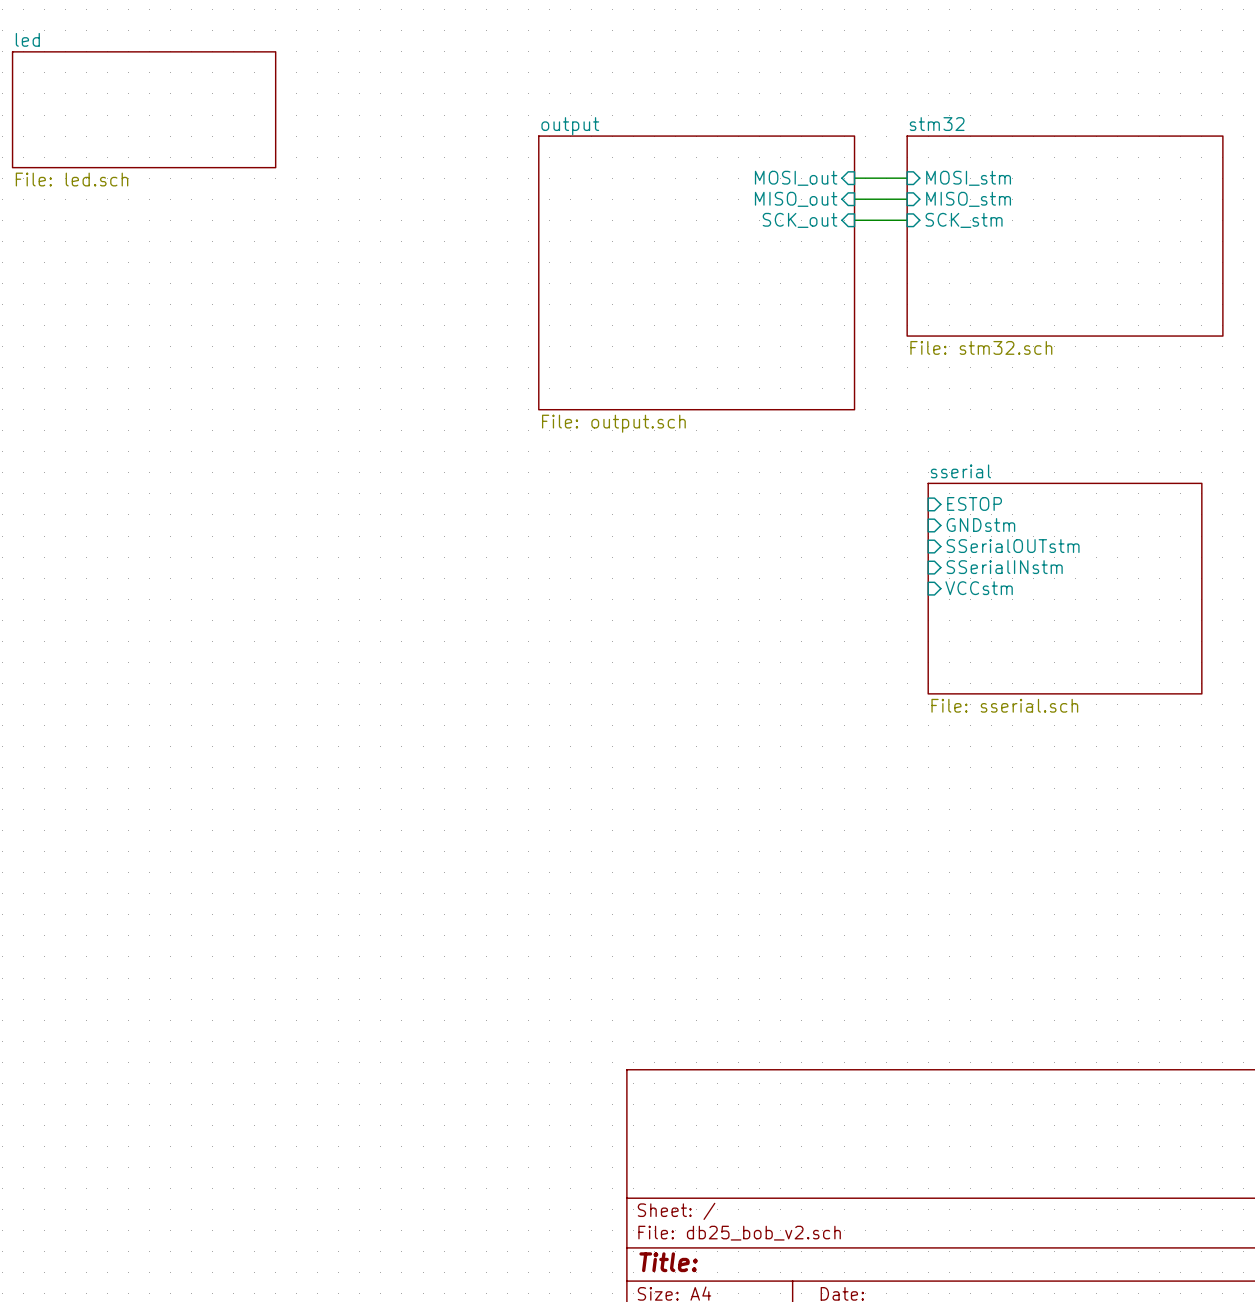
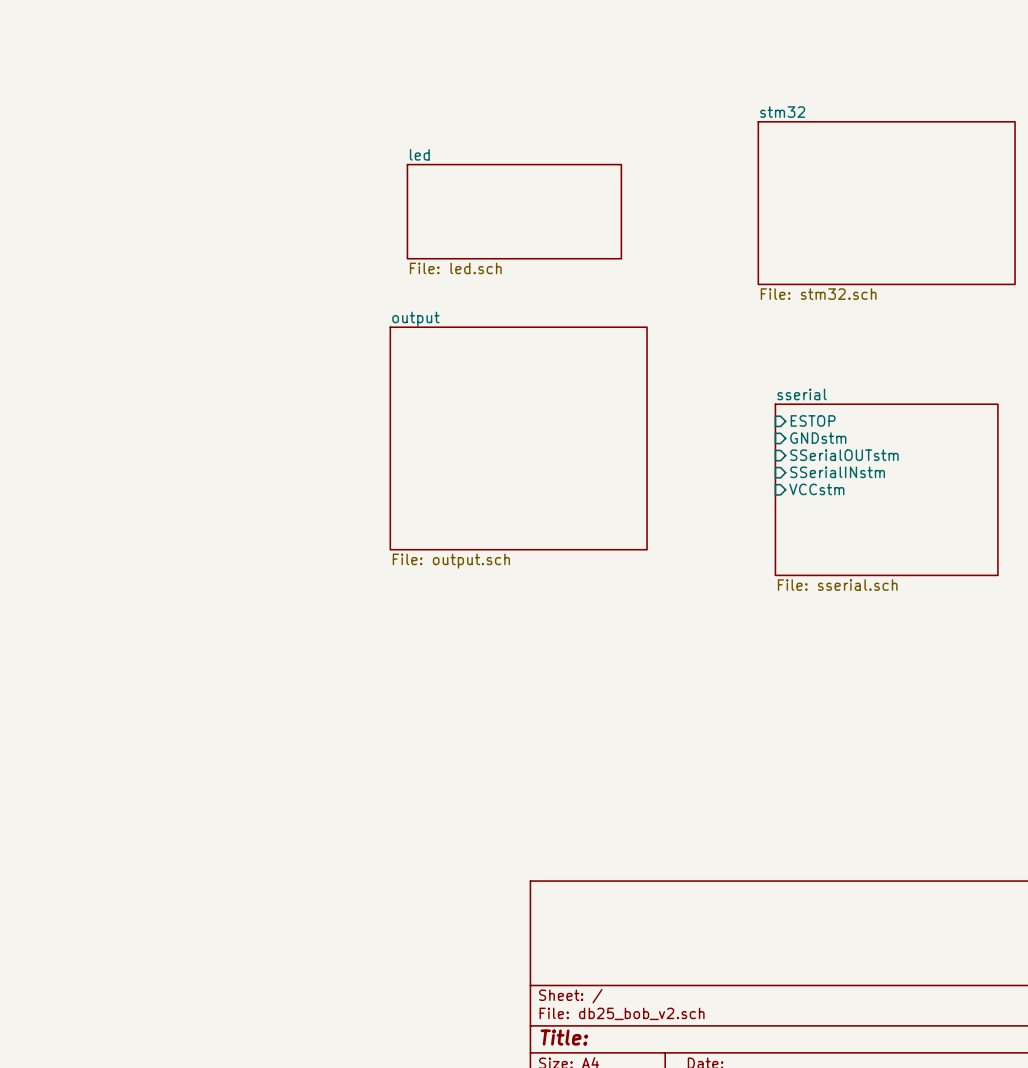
sheet led: File: led.sch (144, 109) -> none
sheet pin: MOSI_out (796, 178) -> none
wire: (854, 178) (907, 178) -> none
sheet pin: MOSI_stm (968, 178) -> none
sheet pin: MISO_out (796, 199) -> none
wire: (854, 199) (907, 199) -> none
sheet pin: MISO_stm (968, 199) -> none
sheet pin: SCK_out (800, 220) -> none
wire: (854, 220) (907, 220) -> none
sheet pin: SCK_stm (964, 220) -> none
sheet led: none -> File: led.sch (514, 211)
sheet output: File: output.sch (696, 272) -> none
sheet output: none -> File: output.sch (518, 438)

